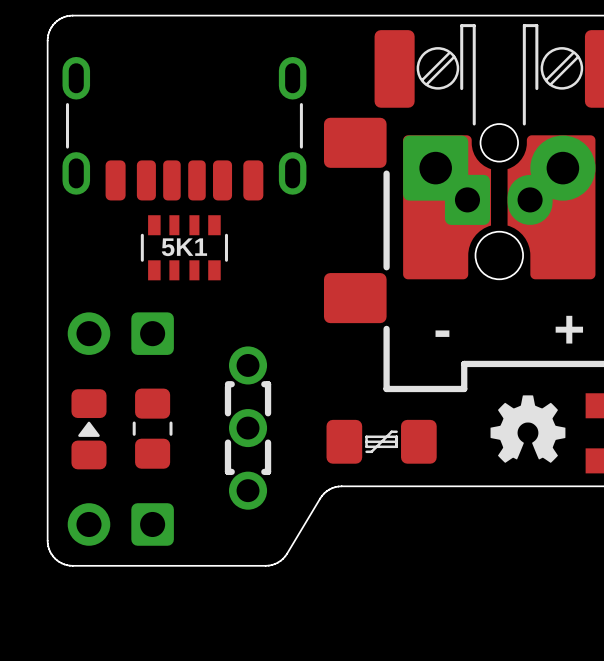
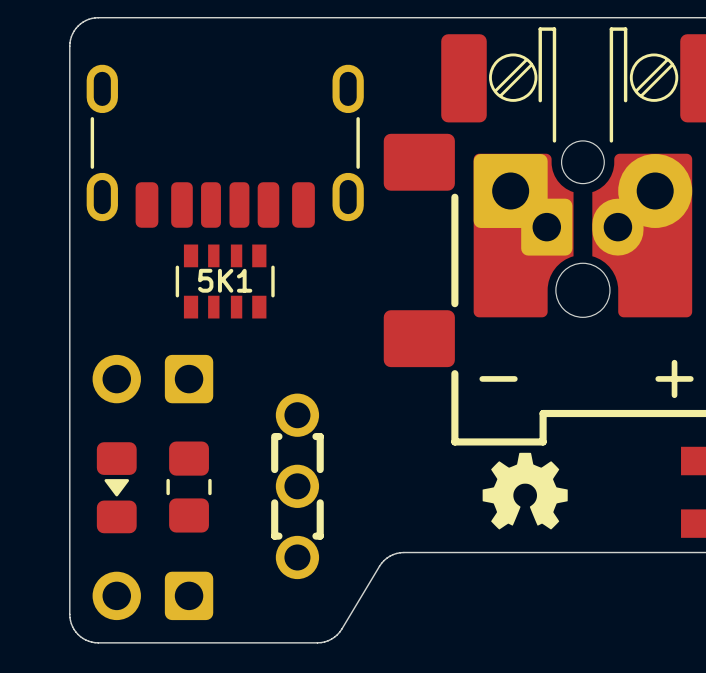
part rotation: 0° (88, 429) -> 180° (116, 487)
drawing position: (527, 429) -> (525, 491)
part: (381, 441) -> none

